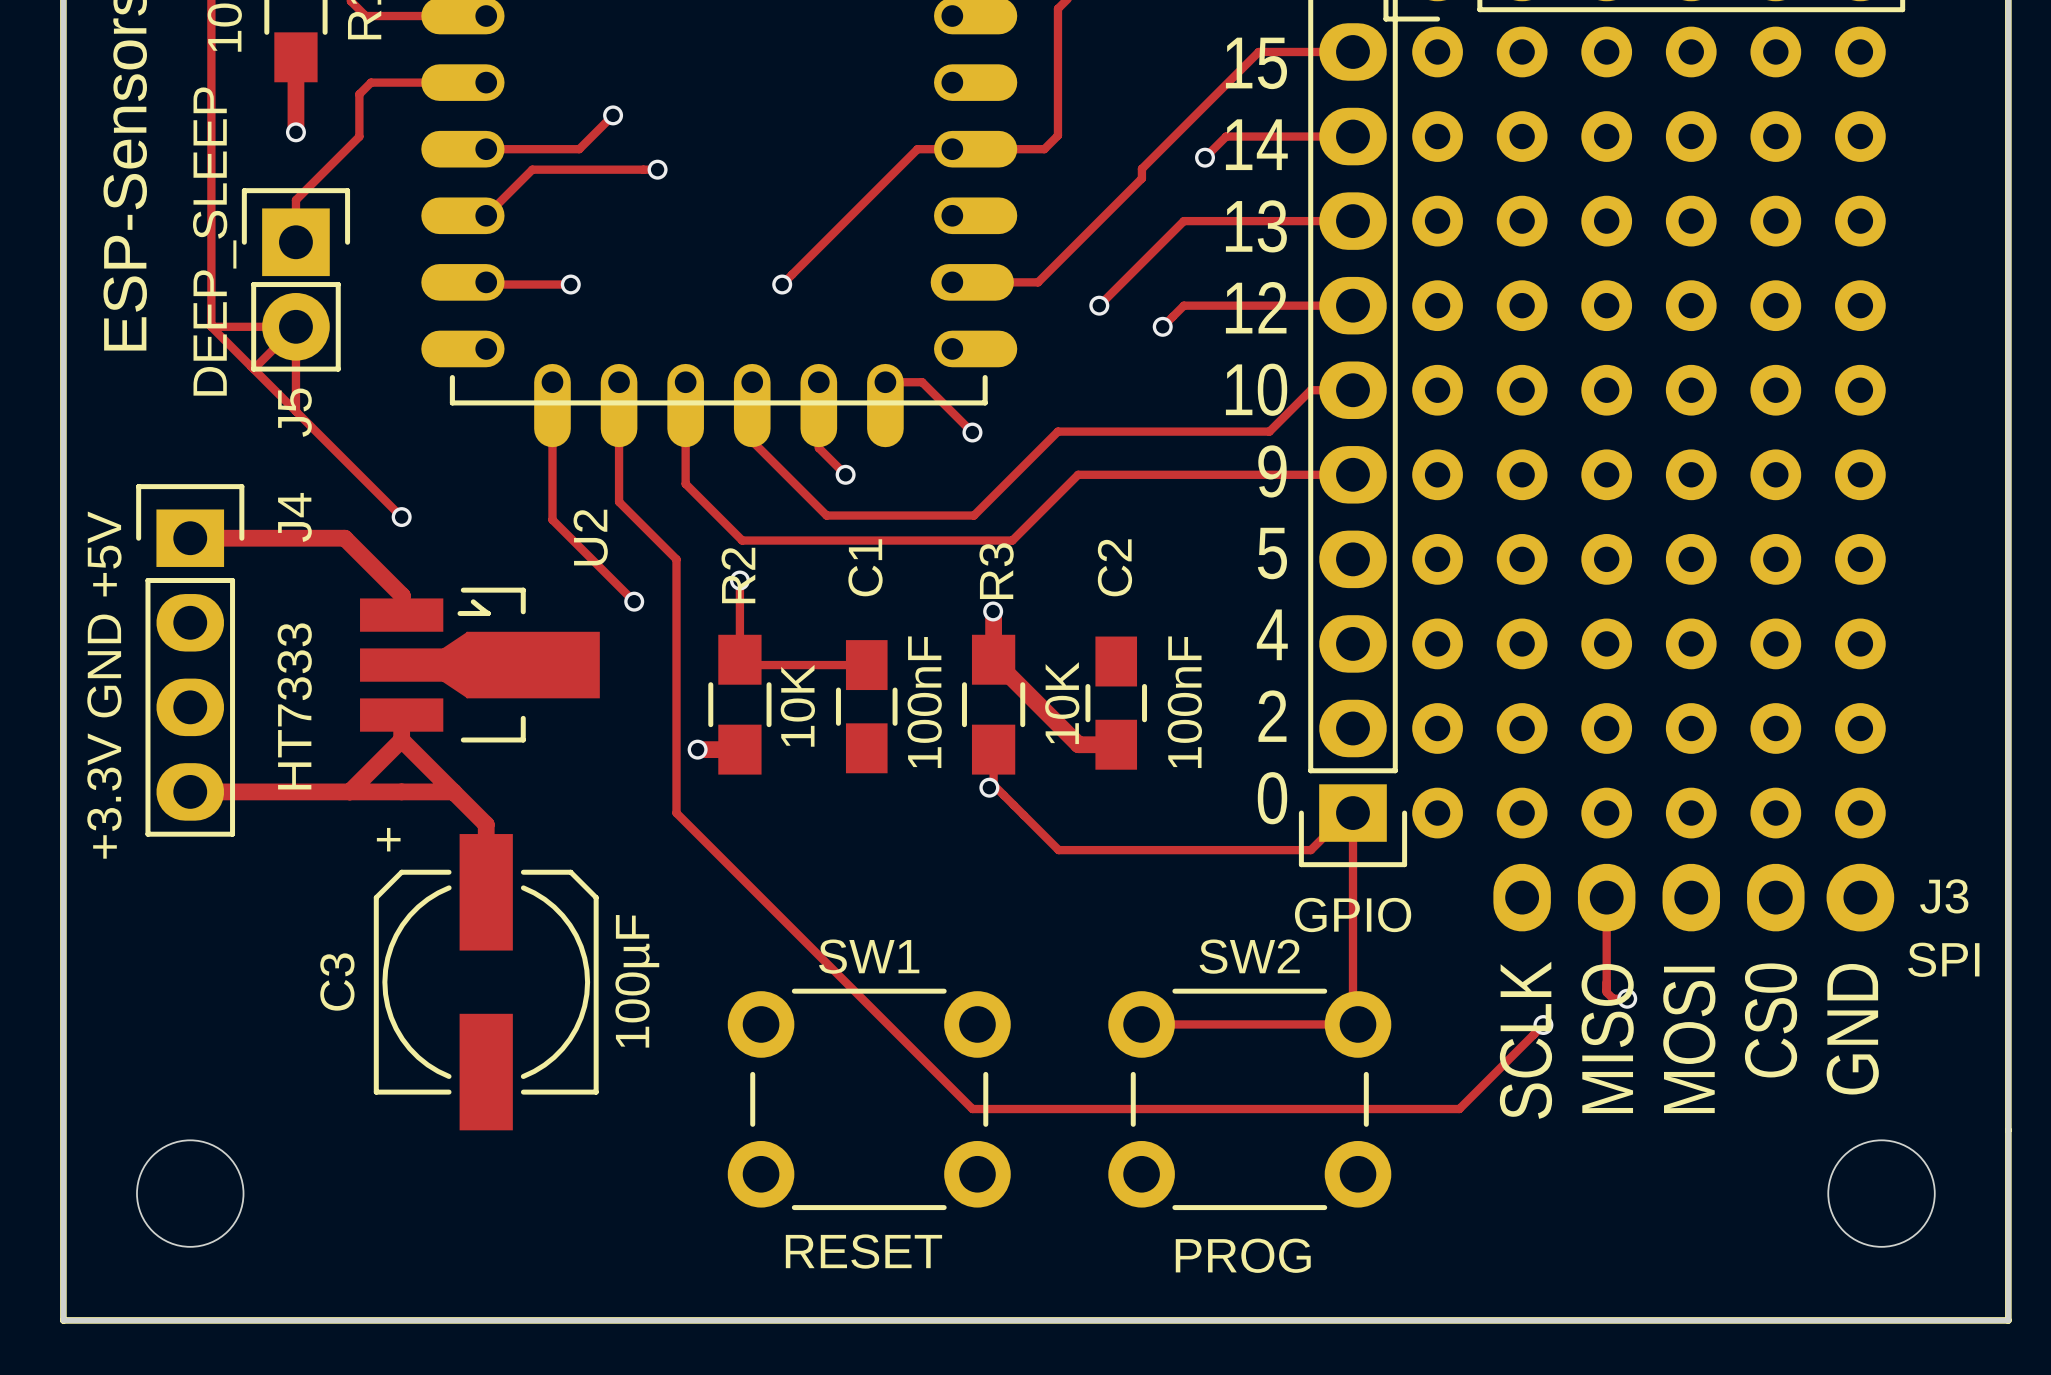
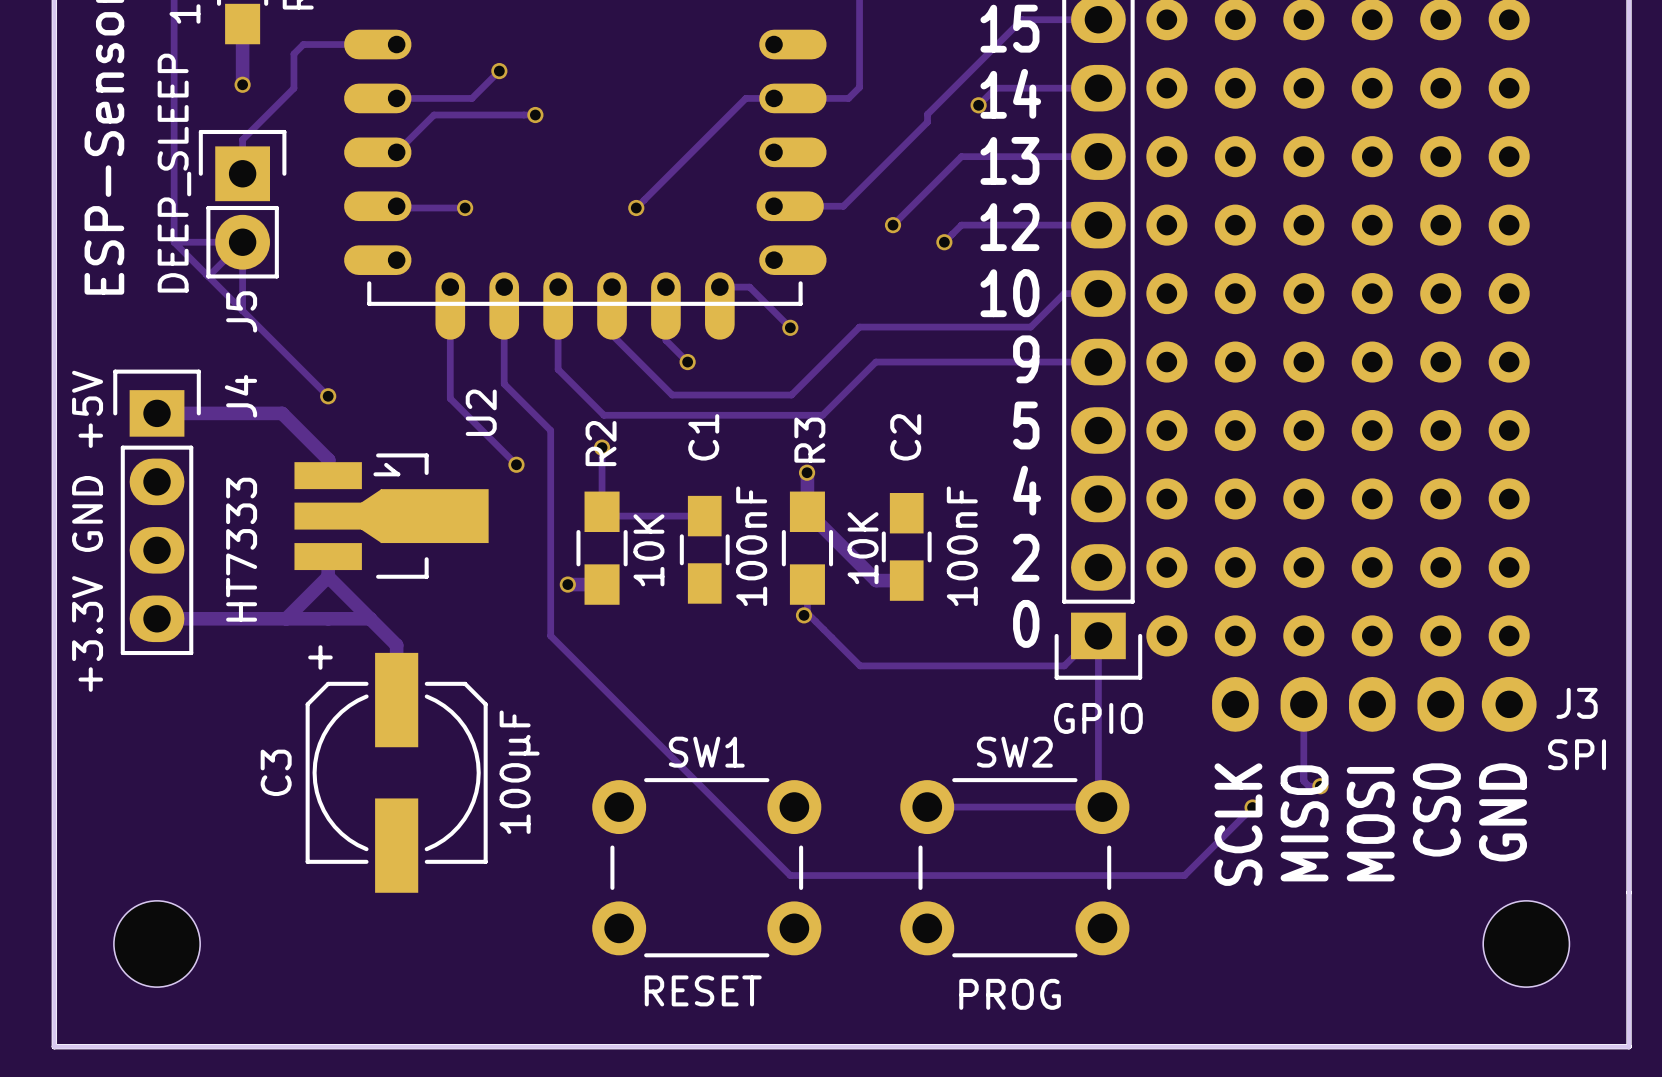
text position: MISO (1607, 1038) -> MISO (1304, 823)
text position: MOSI (1689, 1039) -> MOSI (1370, 824)

